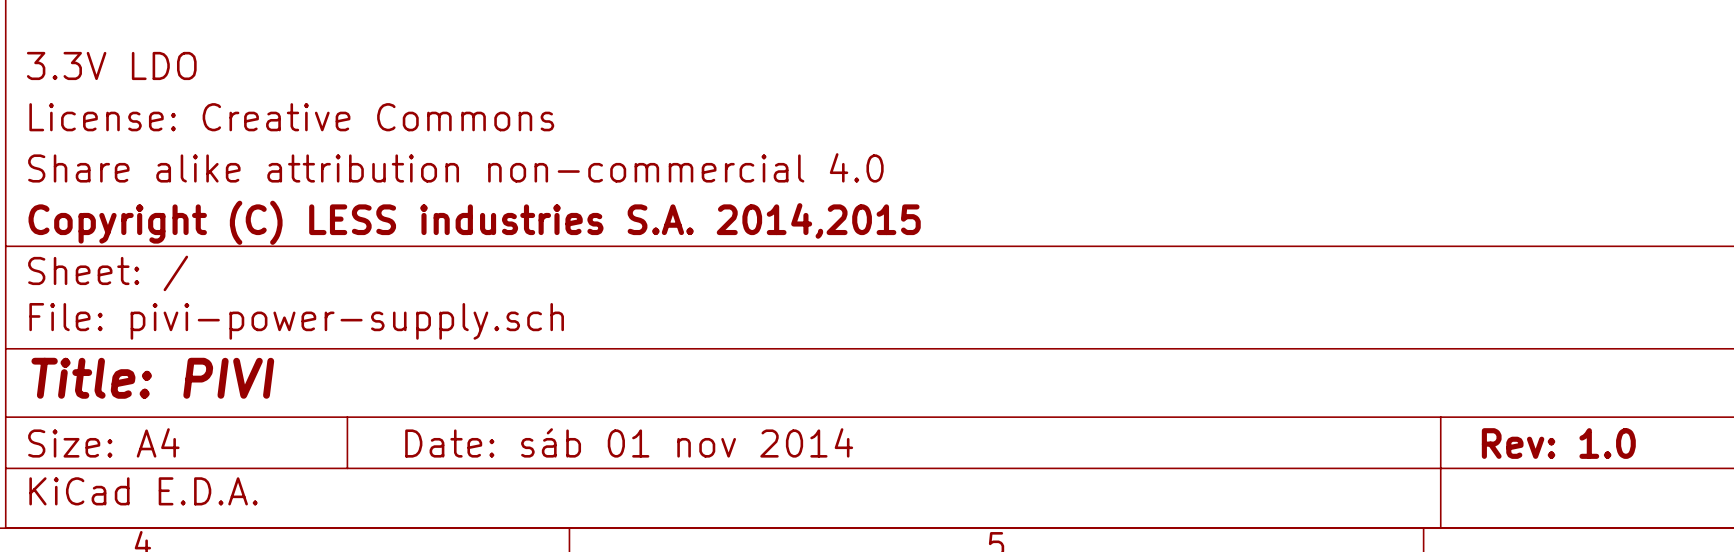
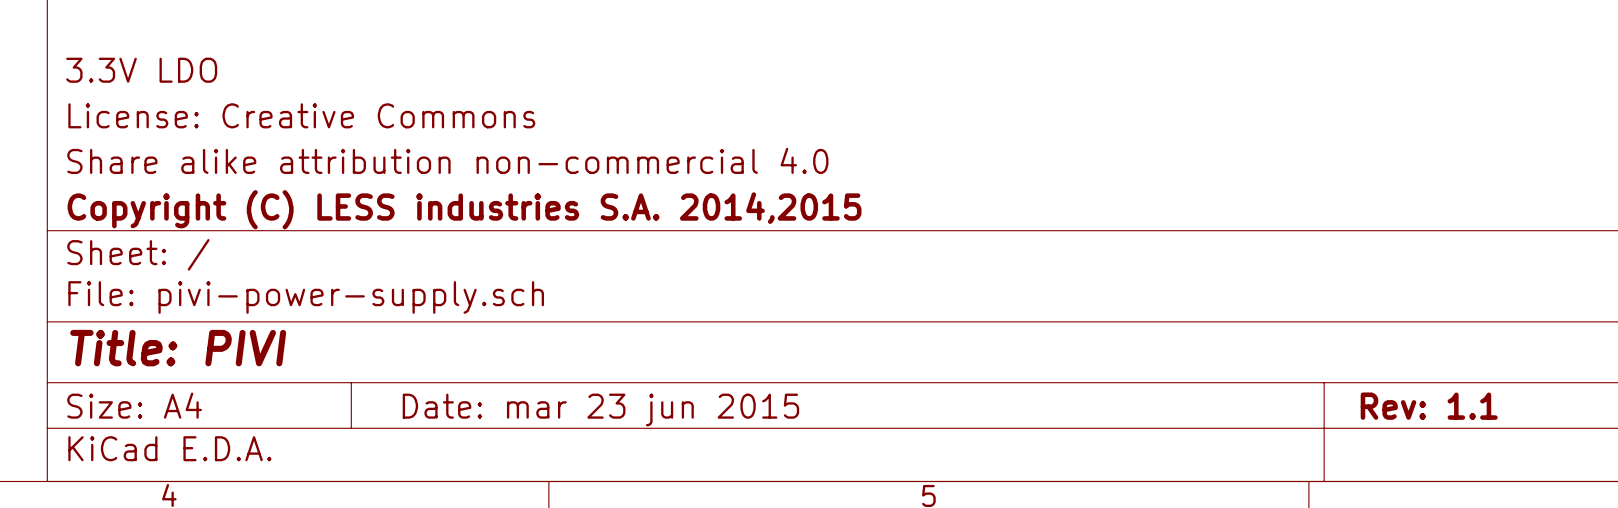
title block: Date: sáb 01 nov 2014 (629, 442) -> Date: mar 23 jun 2015 (600, 409)
title block: Rev: 1.0 (1558, 443) -> Rev: 1.1 (1429, 406)

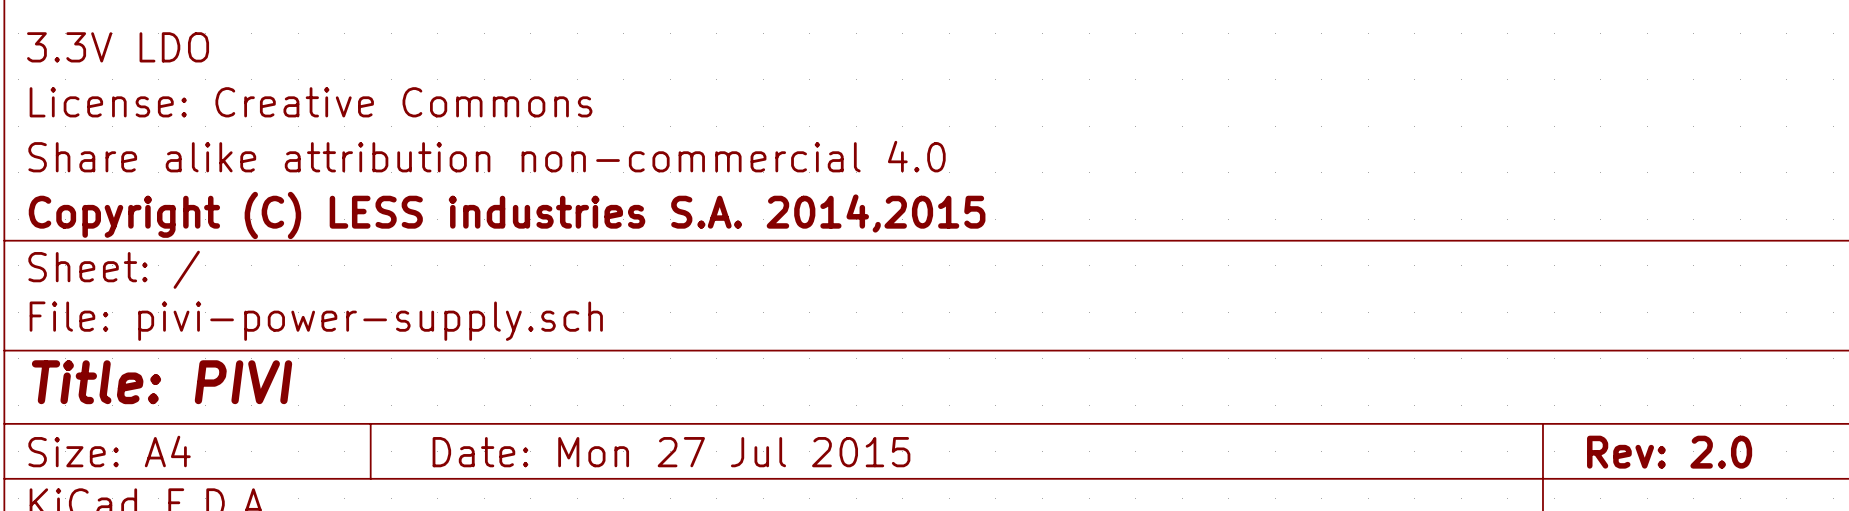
title block: Rev: 1.1 (1429, 406) -> Rev: 2.0 (1669, 452)
title block: Date: mar 23 jun 2015 (600, 409) -> Date: Mon 27 Jul 2015 (671, 452)

